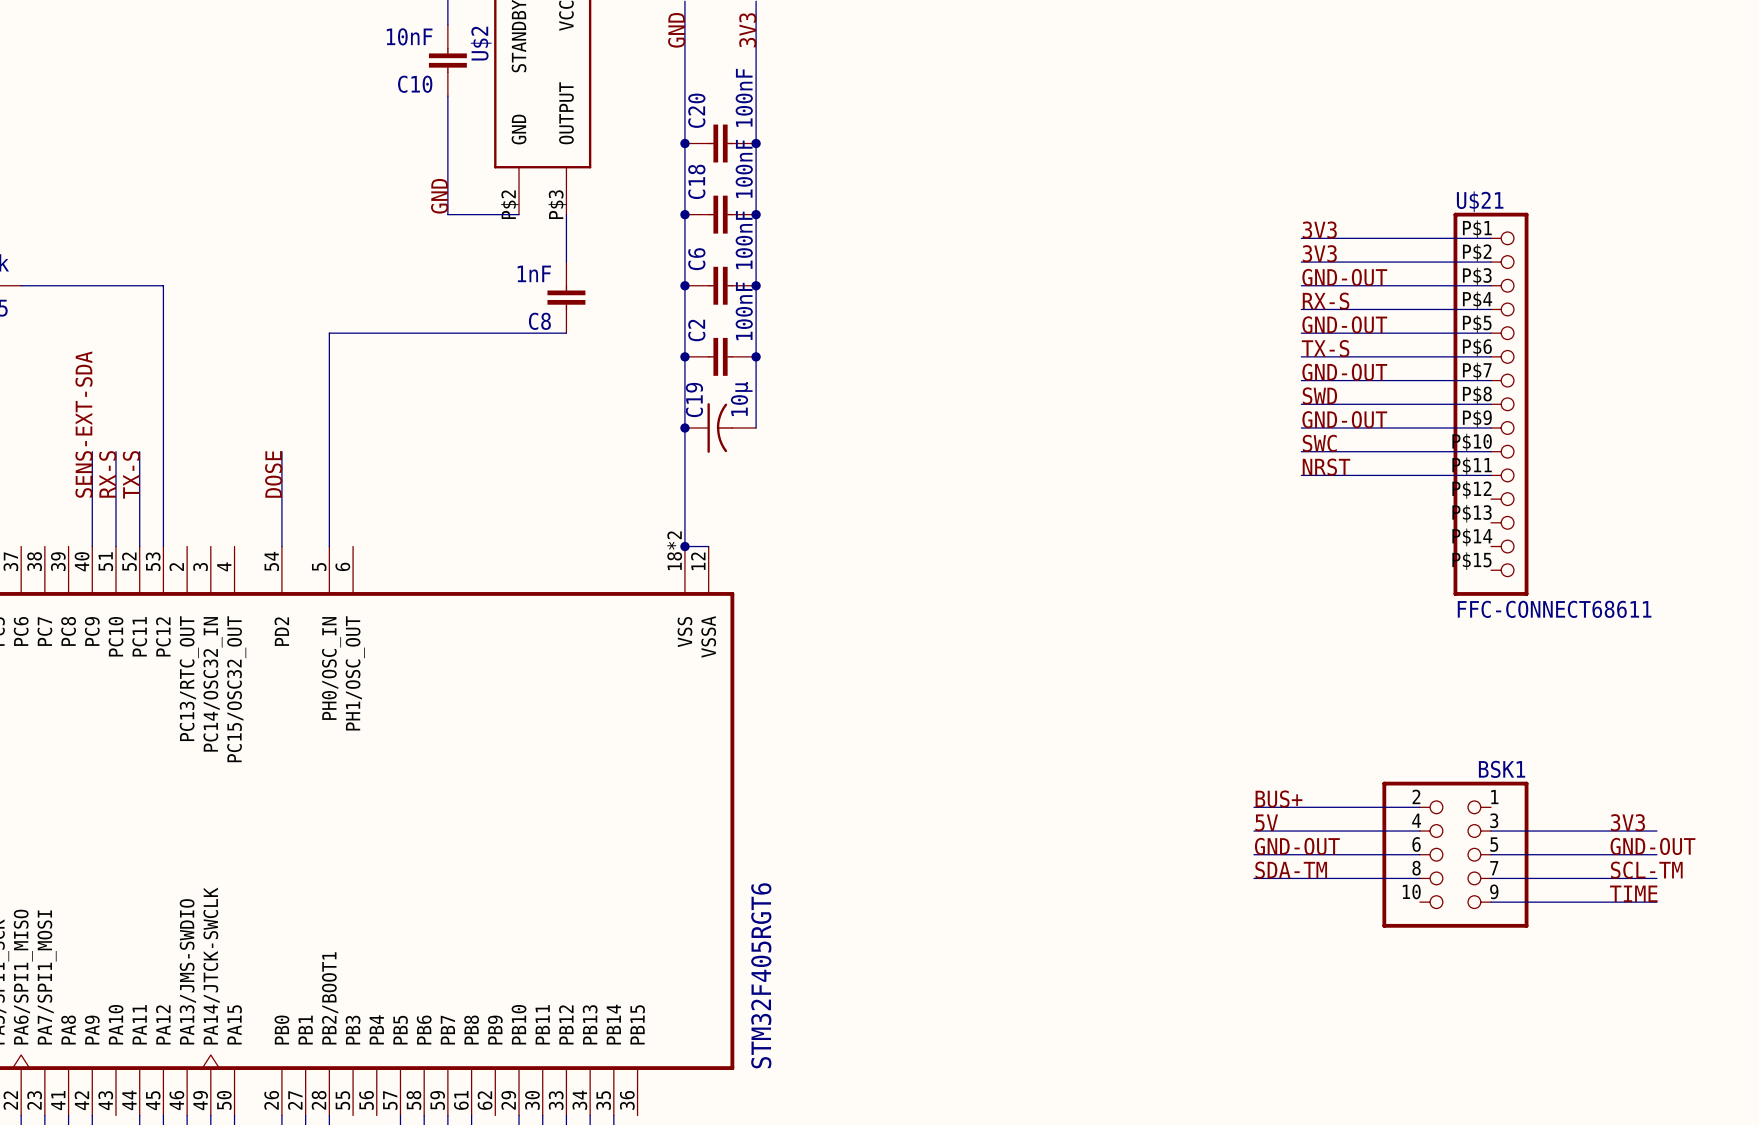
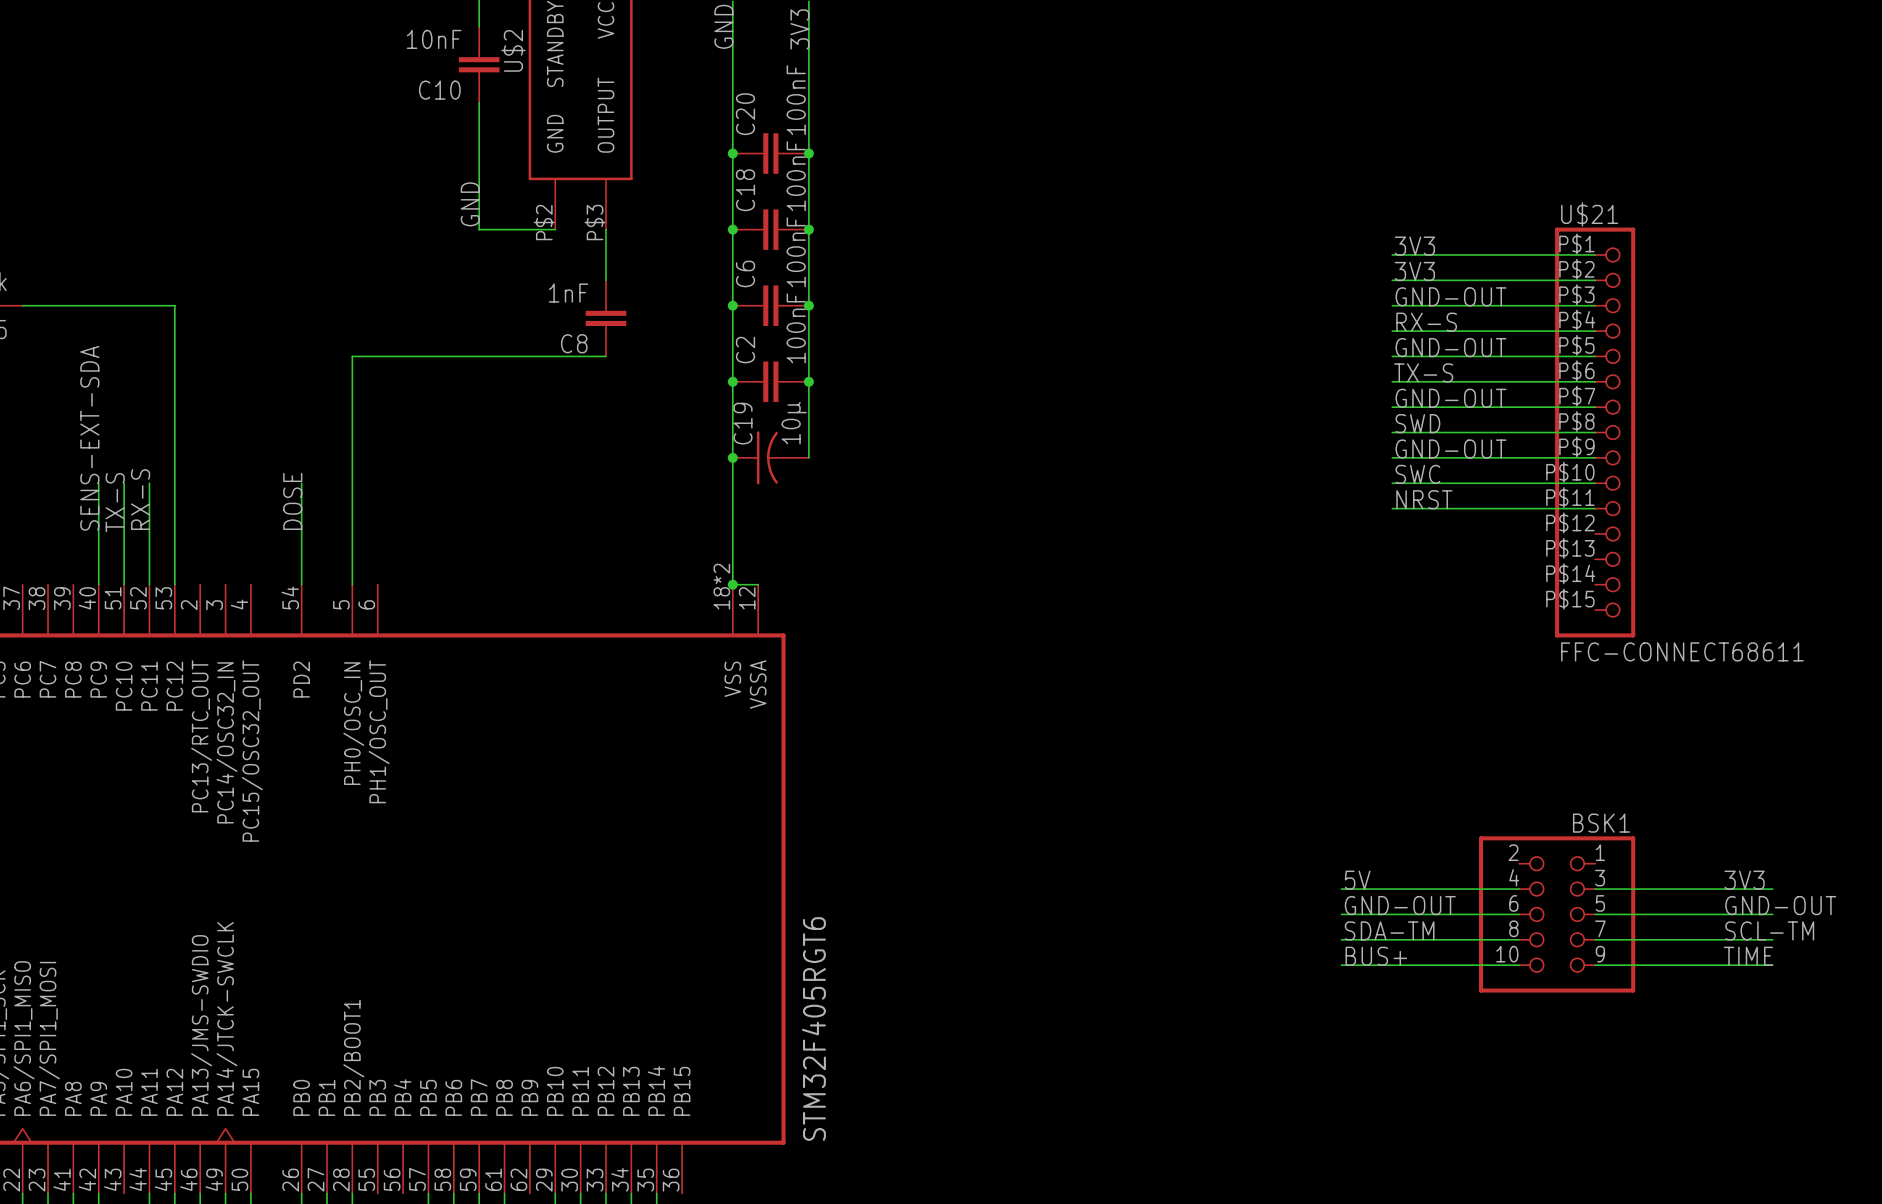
label: RX-S (107, 474) -> TX-S (115, 502)
label: TX-S (131, 474) -> RX-S (140, 499)
label position: BUS+ (1278, 799) -> BUS+ (1376, 956)
wire: (1253, 807) (1419, 807) -> (1341, 965) (1519, 965)

